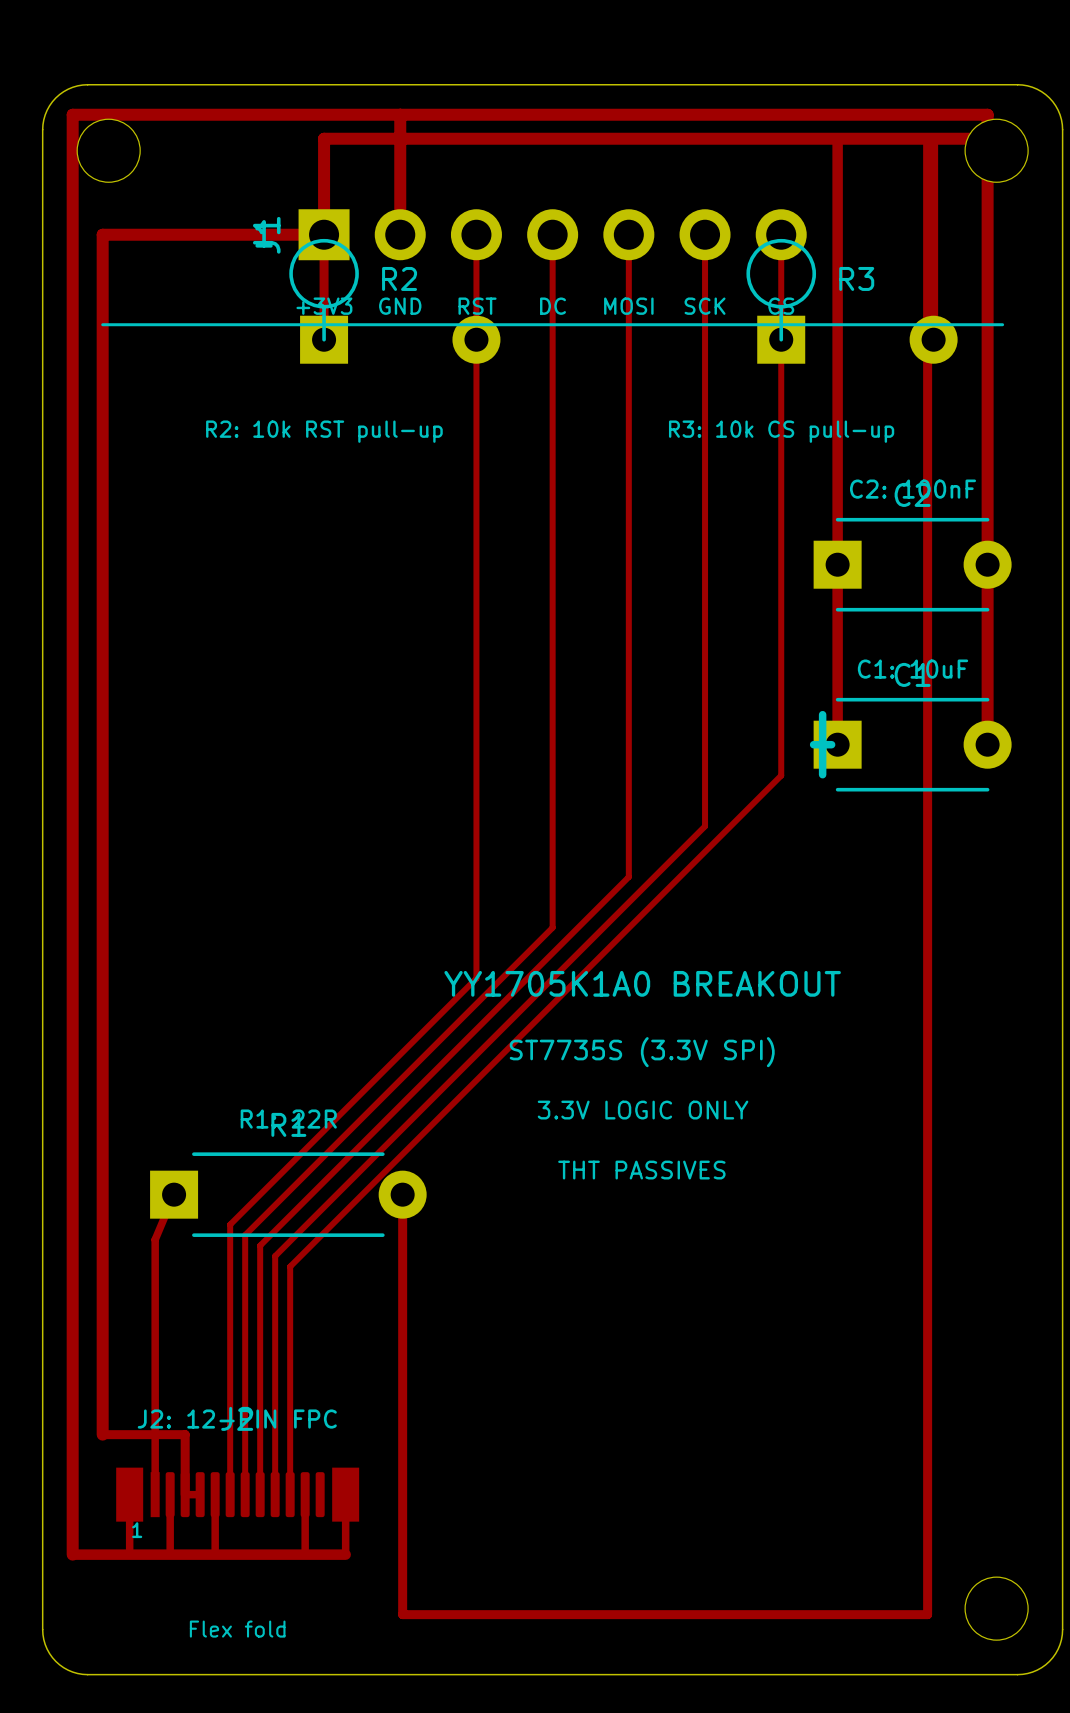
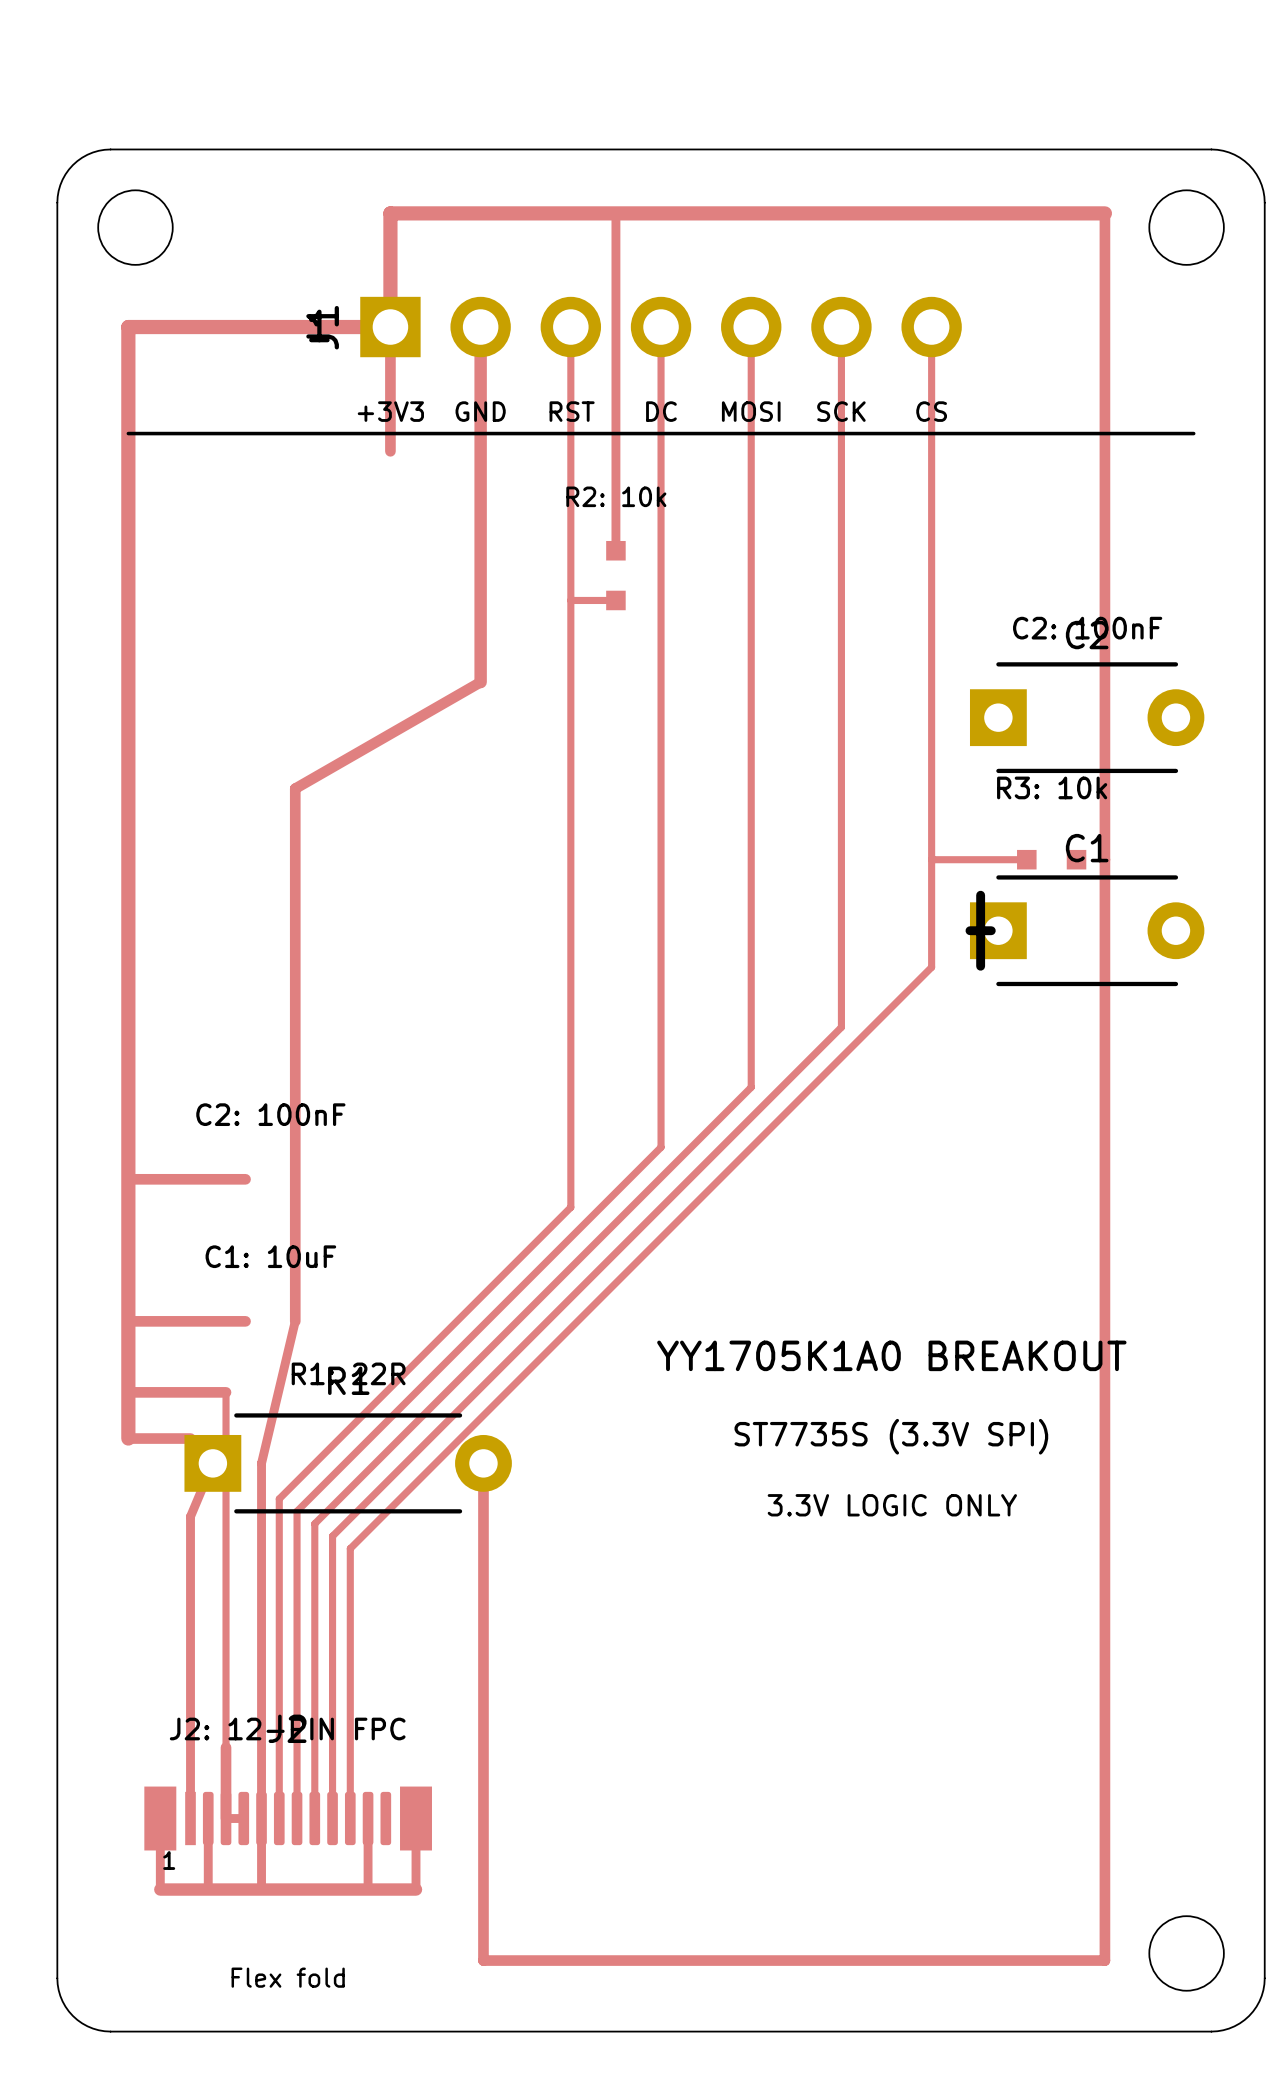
top track: (400, 114) (400, 234) -> (261, 1818) (261, 1463) (295, 1321) (295, 788) (480, 682) (480, 327)
top track: none -> (615, 213) (615, 550)
top track: (837, 138) (837, 744) -> none
top track: (927, 138) (987, 138) -> none
top track: (933, 138) (933, 339) -> none
R2: (394, 301) -> none
R3: (852, 301) -> none
text: none -> R2: 10k (616, 496)
text: R2: 10k RST pull-up (324, 431) -> none
text: R3: 10k CS pull-up (781, 431) -> none
part: none -> (615, 575)
top track: none -> (570, 600) (615, 600)
text: none -> R3: 10k (1052, 787)
text: C1: 10uF (913, 669) -> none
top track: none -> (931, 859) (1026, 859)
part: none -> (1051, 859)
top track: (987, 744) (987, 114) (72, 114) (72, 1554) (129, 1554) -> none
text: none -> C2: 100nF (270, 1114)
top track: none -> (128, 1179) (245, 1179)
text position: YY1705K1A0 BREAKOUT (642, 983) -> YY1705K1A0 BREAKOUT (891, 1355)
text: none -> C1: 10uF (270, 1256)
text position: ST7735S (3.3V SPI) (642, 1052) -> ST7735S (3.3V SPI) (891, 1436)
top track: none -> (128, 1321) (245, 1321)
text position: 3.3V LOGIC ONLY (643, 1110) -> 3.3V LOGIC ONLY (892, 1505)
text: THT PASSIVES (641, 1170) -> none
top track: (102, 1173) (102, 1434) (185, 1434) -> (128, 1392) (226, 1392) (226, 1747)
top track: none -> (128, 1438) (190, 1438)

